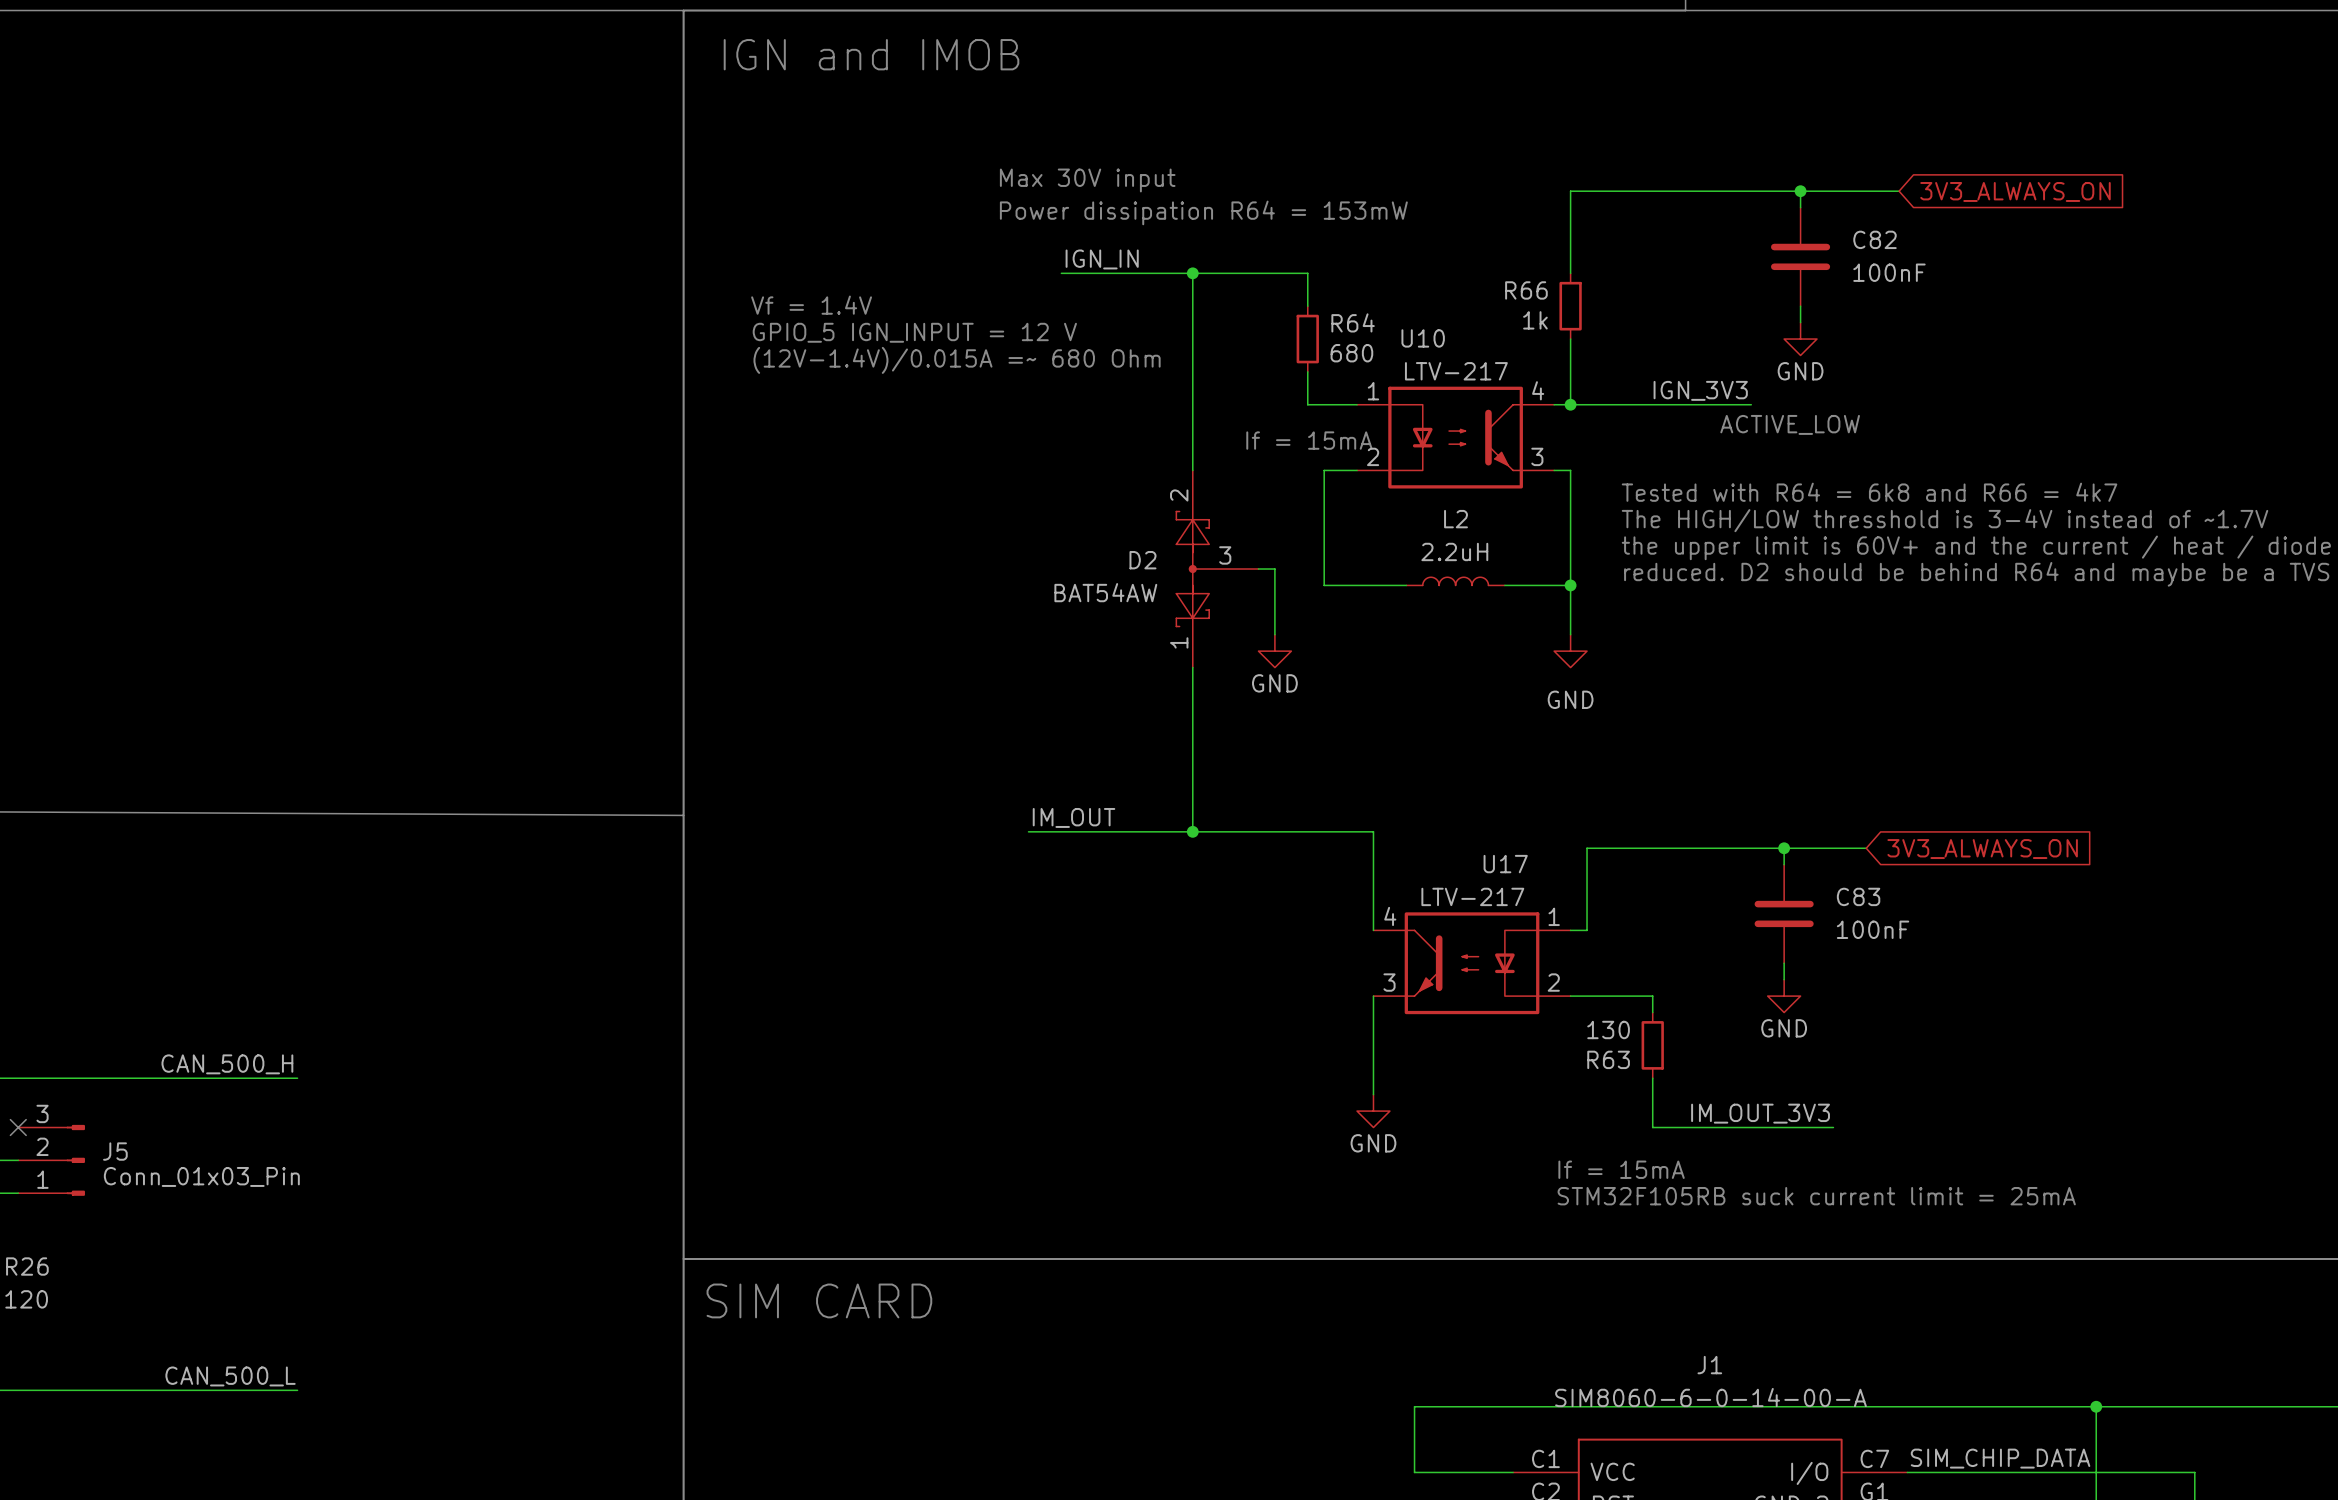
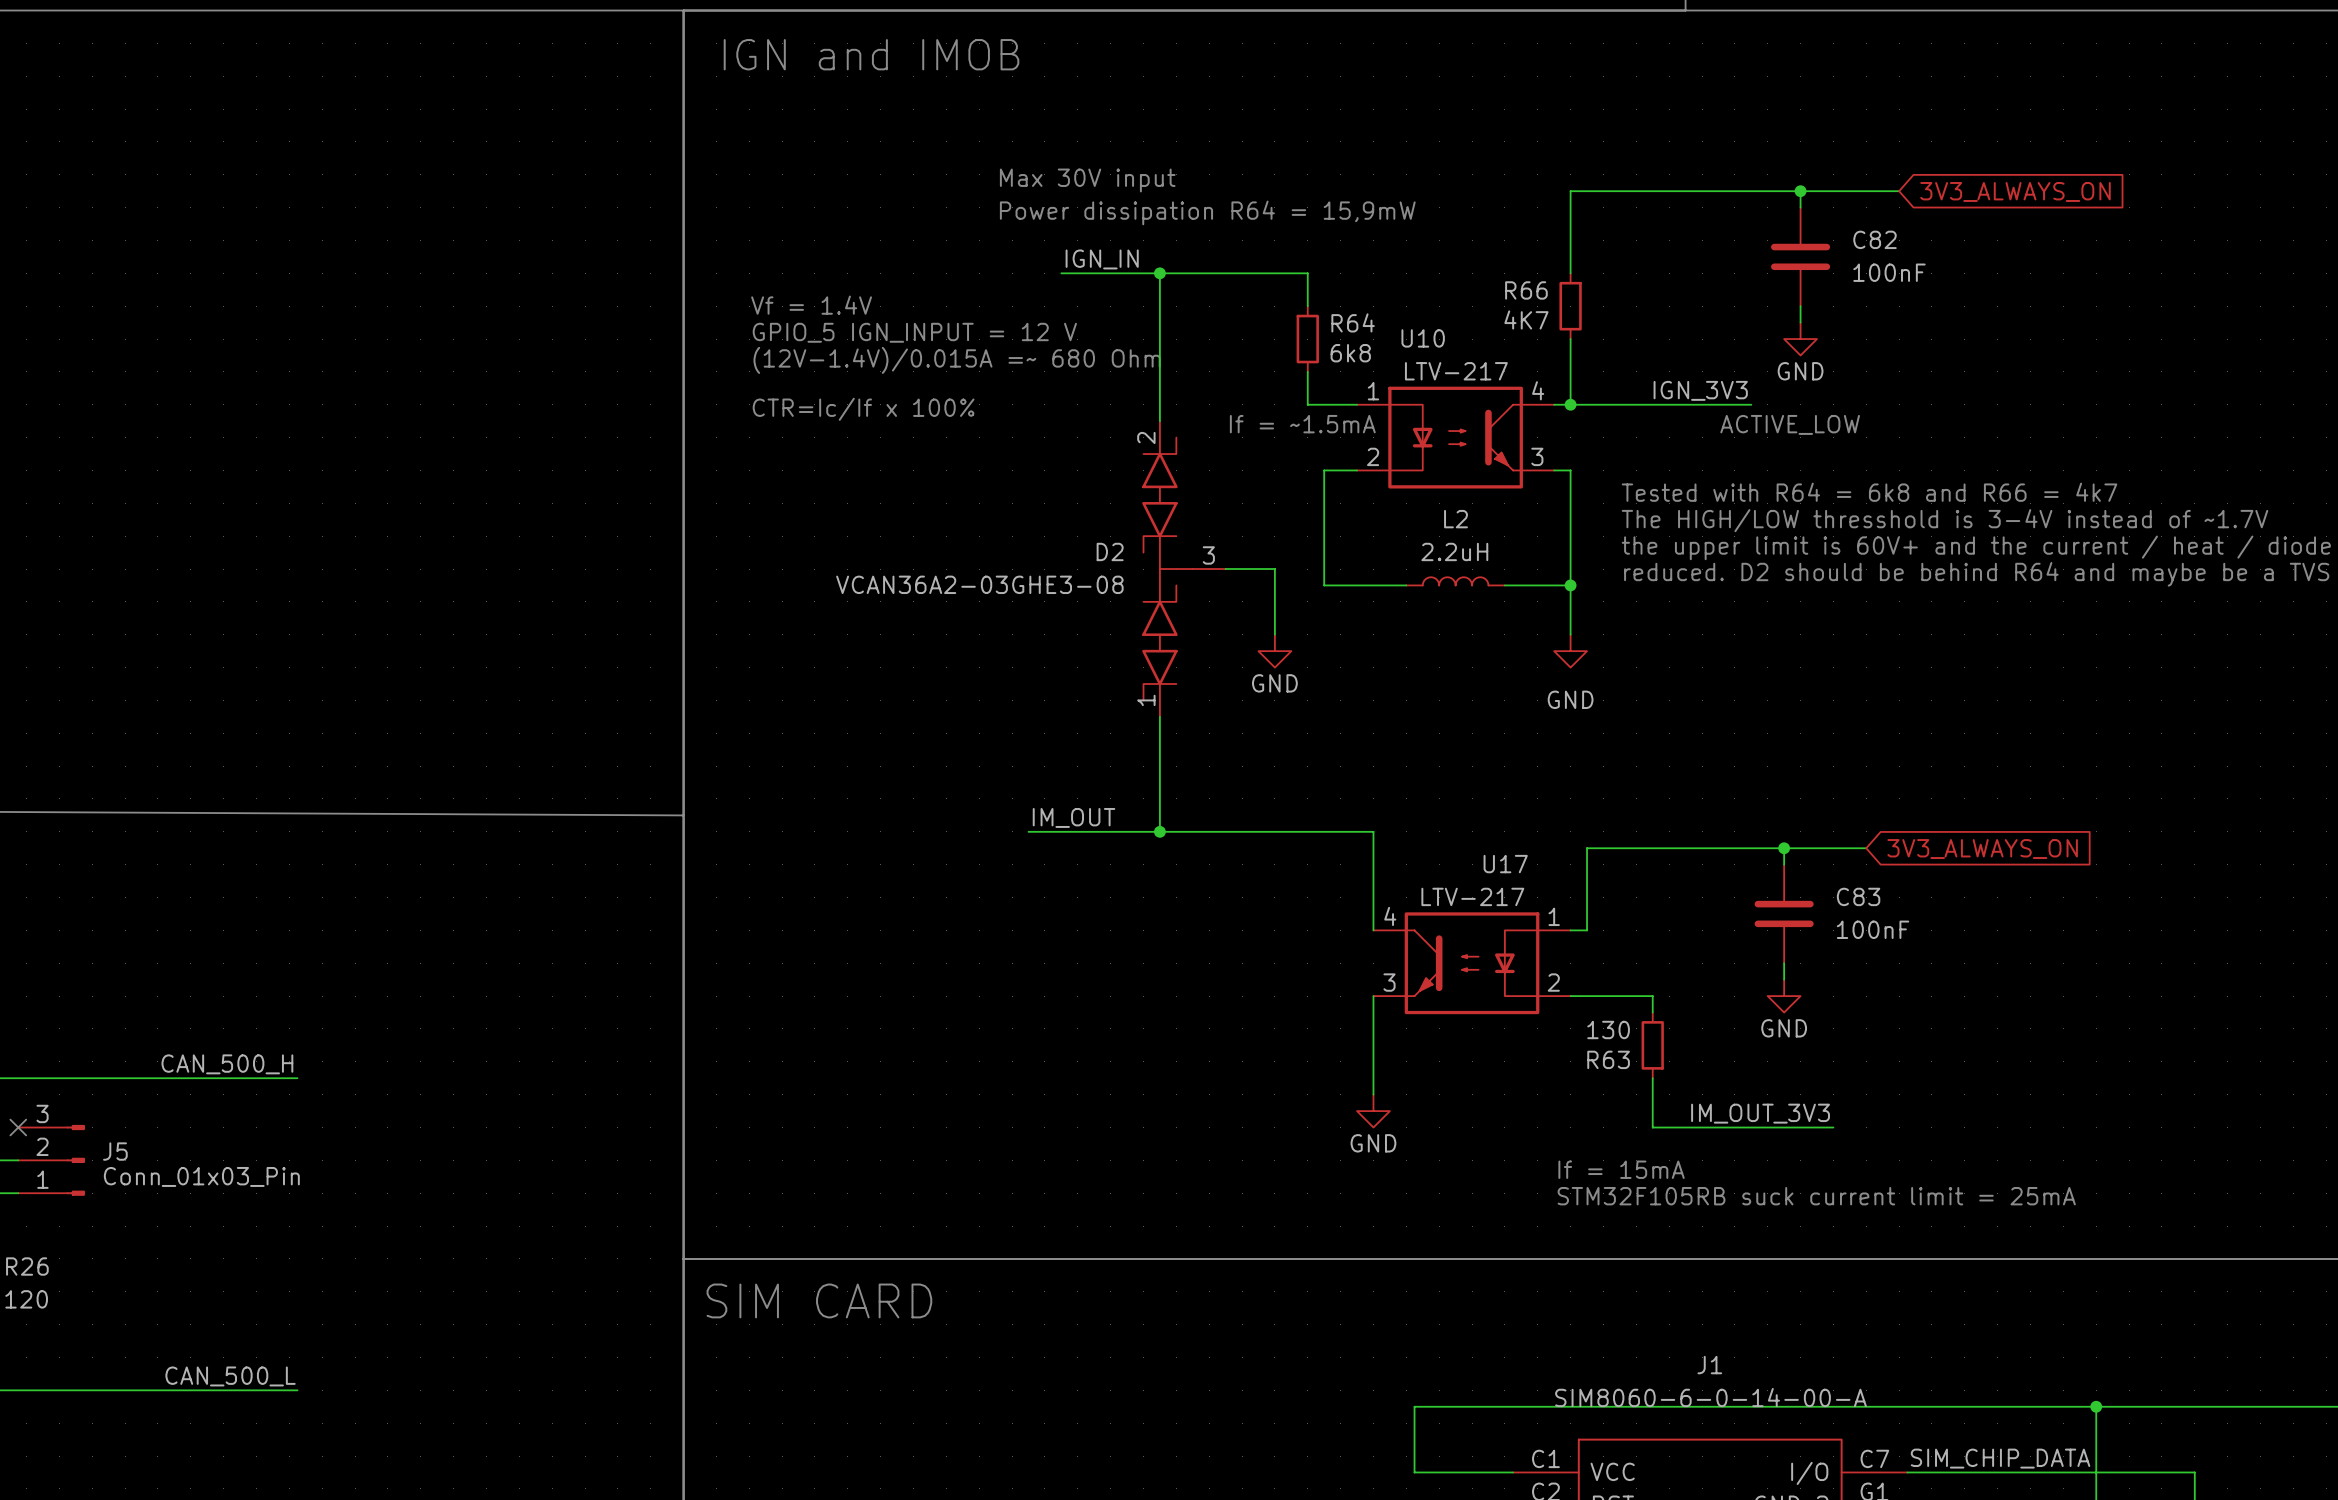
text: Power dissipation R64 = 153mW (1203, 212) -> Power dissipation R64 = 15,9mW (1207, 212)
wire: none -> (1159, 273) (1159, 421)
wire: (1192, 273) (1192, 470) -> none
junction position: (1192, 273) -> (1159, 273)
R66 value: 1k (1535, 320) -> 4K7 (1526, 319)
R64 value: 680 (1351, 353) -> 6k8 (1350, 353)
text: none -> CTR=Ic/If x 100% (863, 409)
text: If = 15mA (1309, 440) -> If = ~1.5mA (1302, 424)
D2 symbol: [1176, 470, 1259, 668] -> [1142, 421, 1226, 717]
D2 value: BAT54AW (1105, 592) -> VCAN36A2-03GHE3-08 (979, 584)
wire: (1192, 667) (1192, 831) -> none
wire: none -> (1159, 716) (1159, 831)
junction position: (1192, 831) -> (1159, 831)

